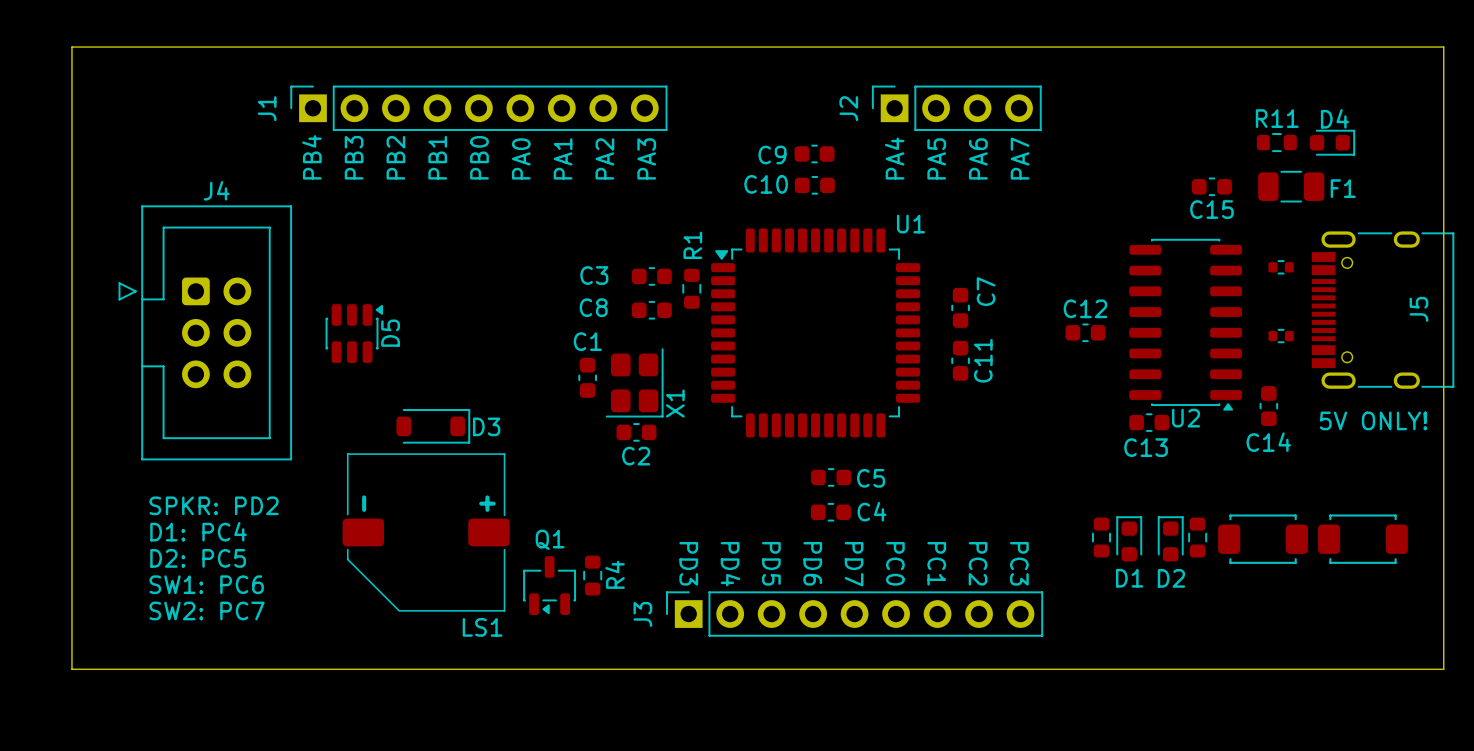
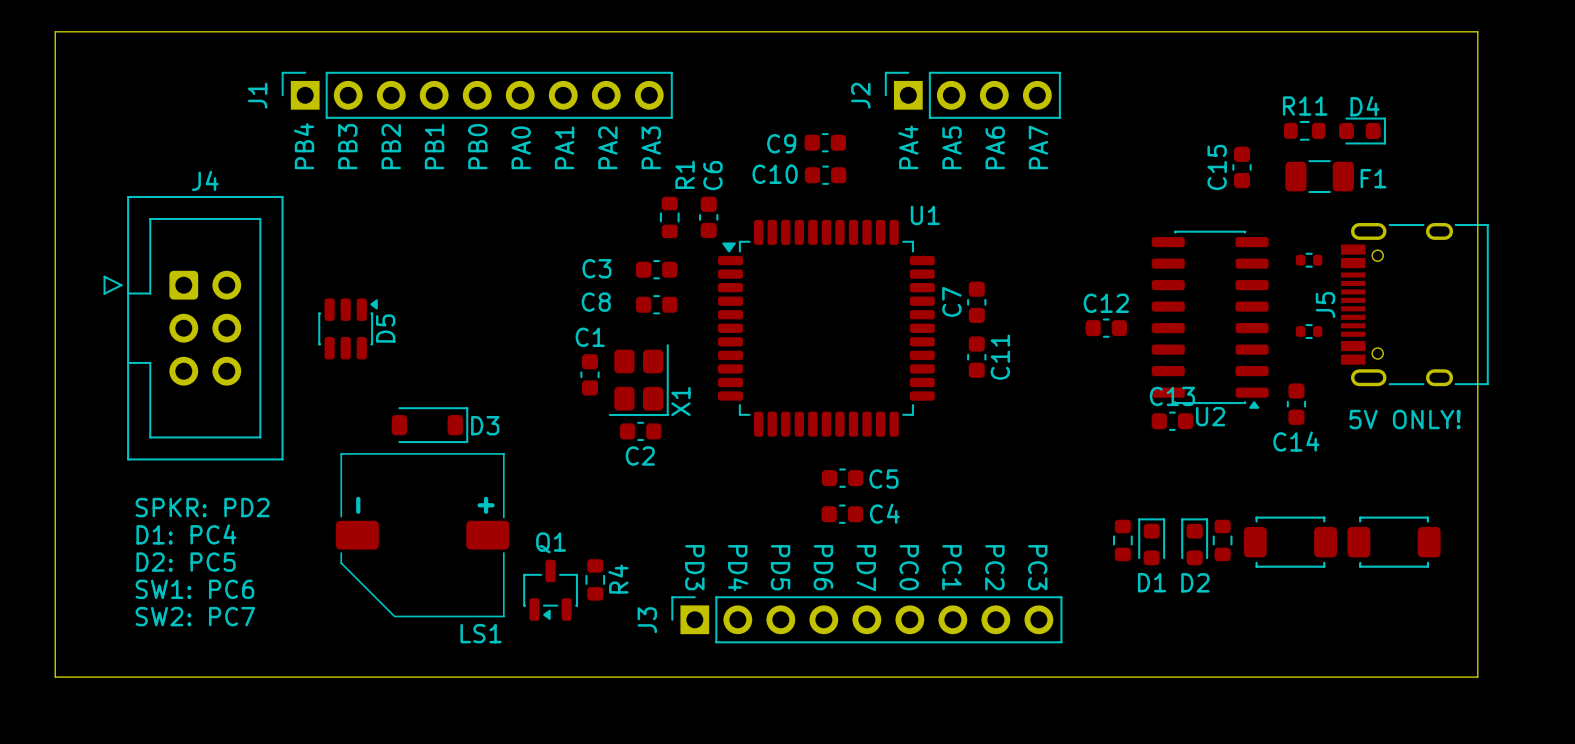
C15 rotation: 0° (1211, 186) -> 90° clockwise (1241, 167)
C6: none -> (708, 217)
R1 name position: R1 (692, 245) -> R1 (685, 174)
R1 position: (691, 288) -> (669, 217)
C7 name position: C7 (986, 291) -> C7 (951, 301)
J5 name position: J5 (1418, 309) -> J5 (1325, 304)
C13 name position: C13 (1146, 447) -> C13 (1172, 396)

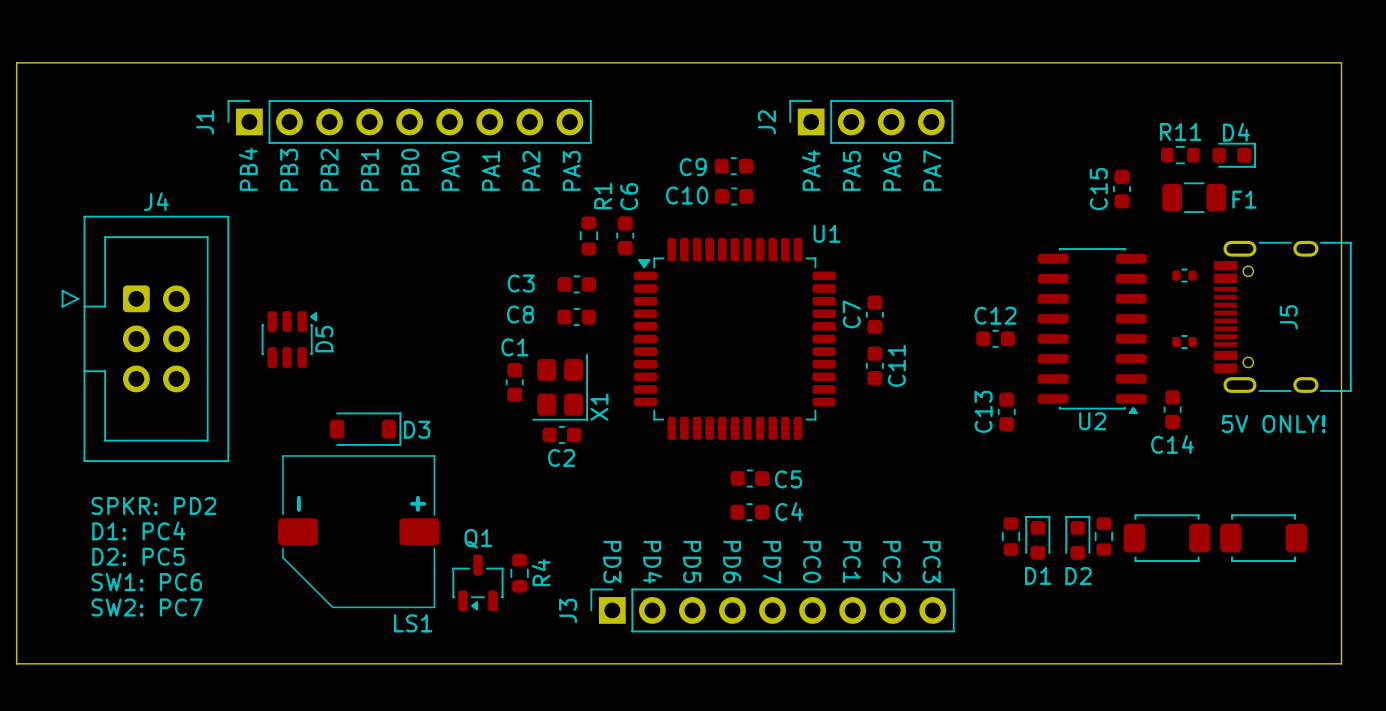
J5 name position: J5 (1325, 304) -> J5 (1288, 317)
C13 name position: C13 (1172, 396) -> C13 (983, 411)
C13 rotation: 0° (1172, 421) -> 90° clockwise (1006, 411)
C13 position: (1172, 421) -> (1006, 411)

